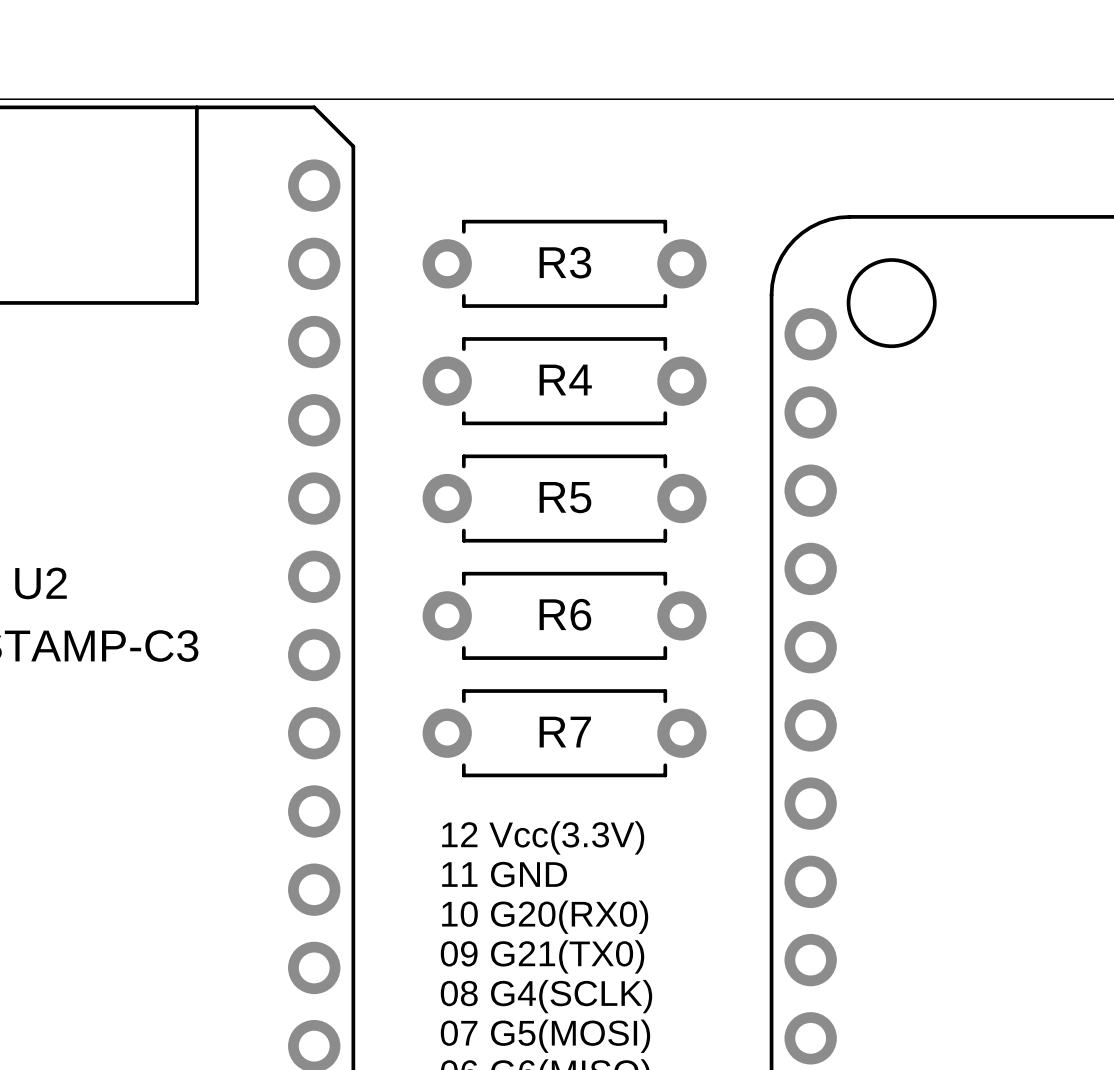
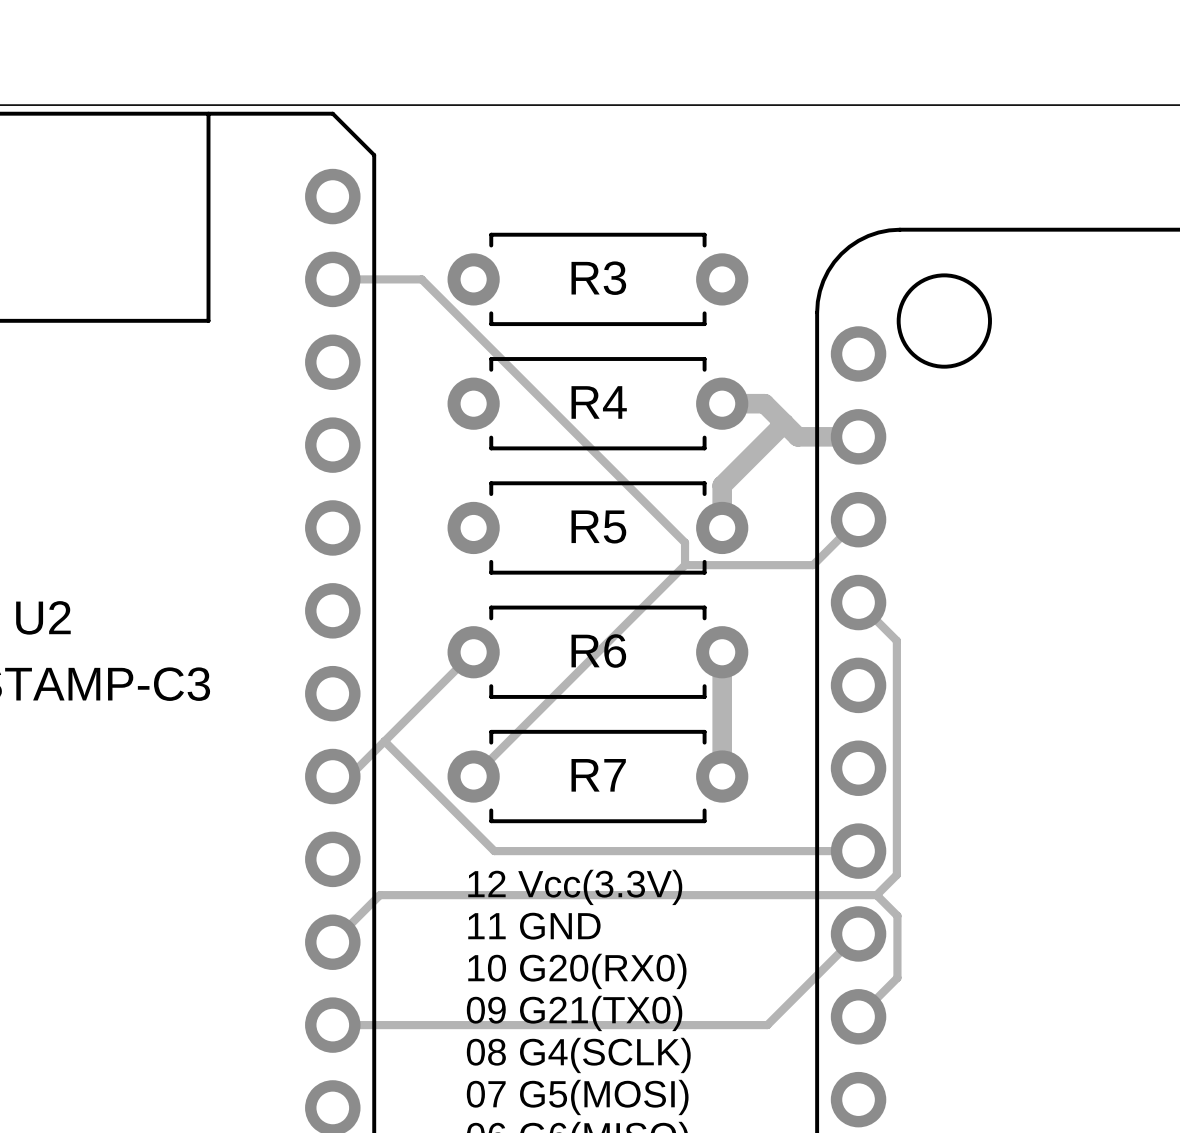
track: none -> (332, 279) (421, 279) (685, 542) (685, 565)
track: none -> (722, 403) (764, 403) (797, 436) (858, 436)
track: none -> (784, 423) (722, 485) (722, 527)
track: none -> (858, 519) (813, 565) (685, 565)
track: none -> (685, 565) (473, 776)
track: none -> (858, 602) (896, 640) (896, 874) (876, 895)
track: none -> (473, 652) (349, 776) (332, 776)
track: none -> (722, 652) (722, 776)
track: none -> (384, 741) (494, 851) (858, 851)
track: none -> (876, 895) (897, 915) (897, 977) (858, 1016)
track: none -> (876, 895) (379, 895) (332, 942)
track: none -> (858, 933) (767, 1025) (332, 1025)

